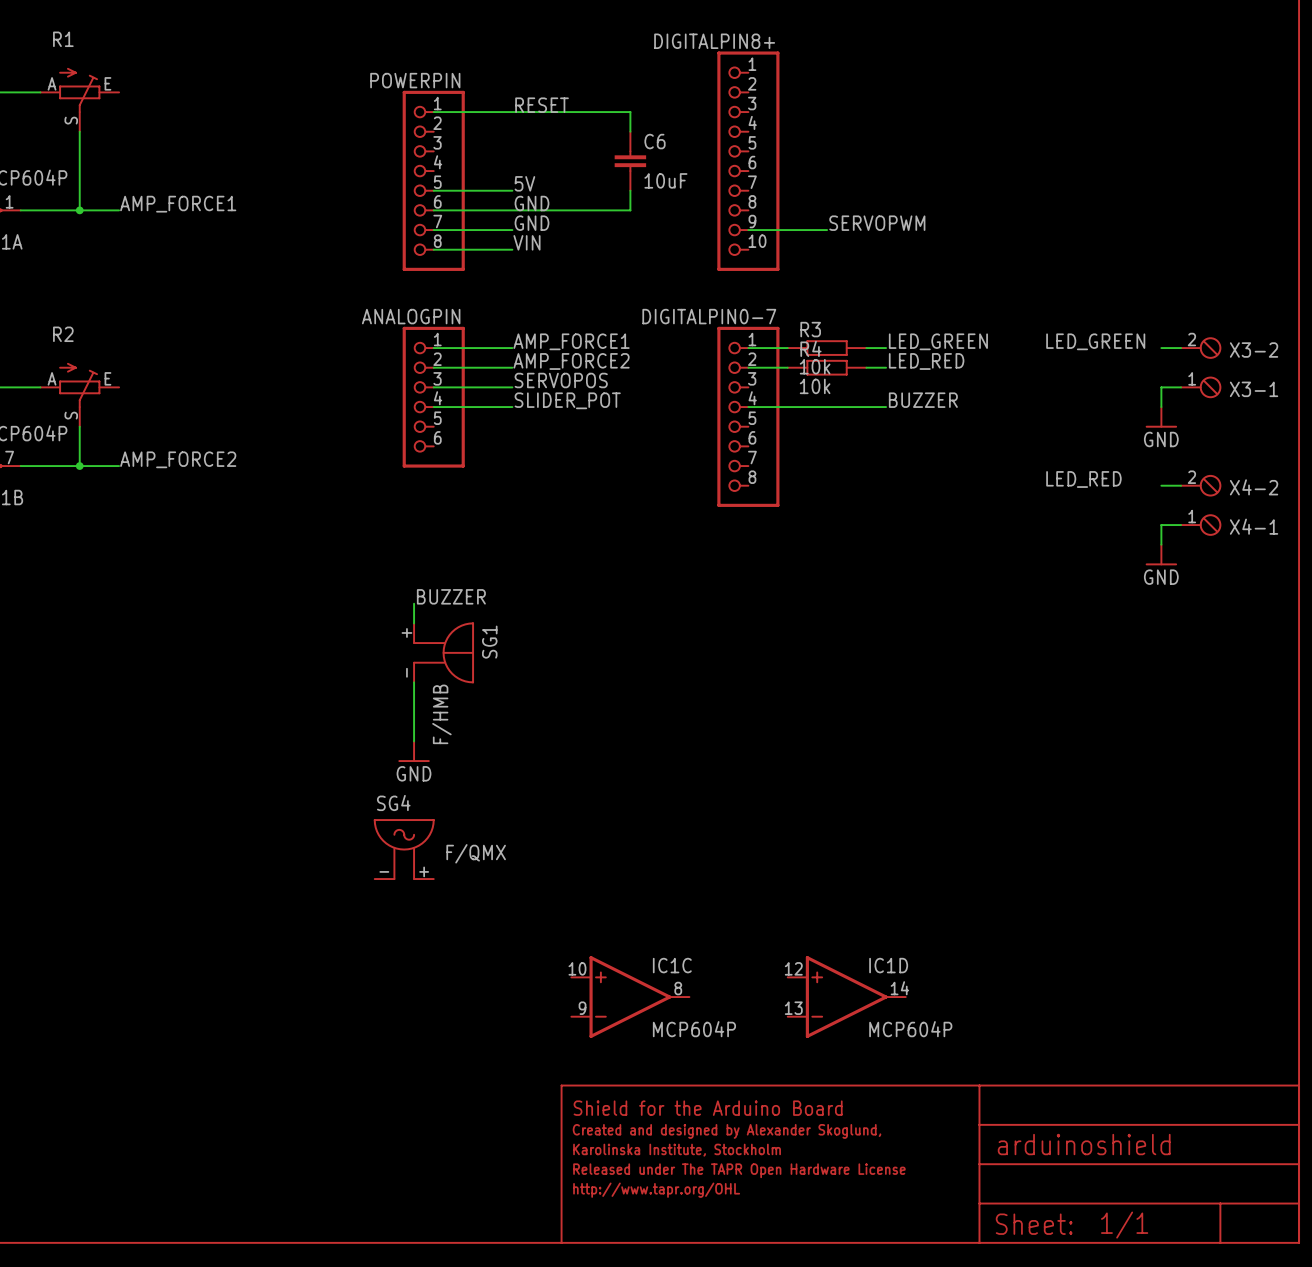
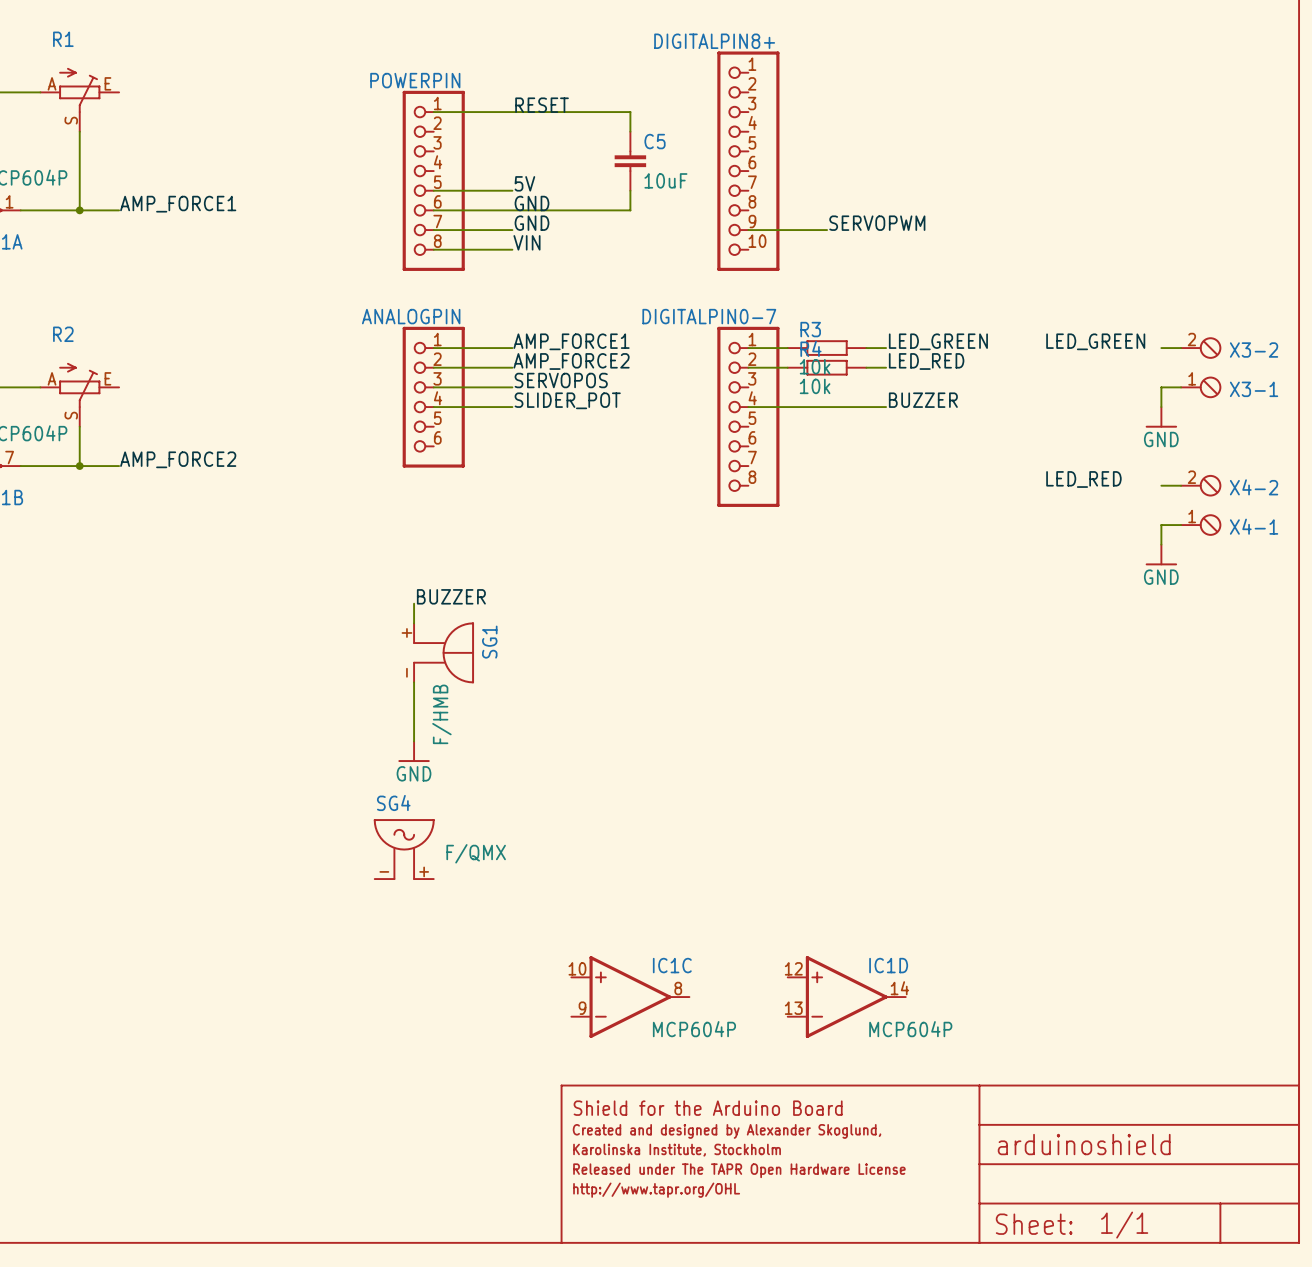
C6 name: C6 (655, 141) -> C5 (655, 141)

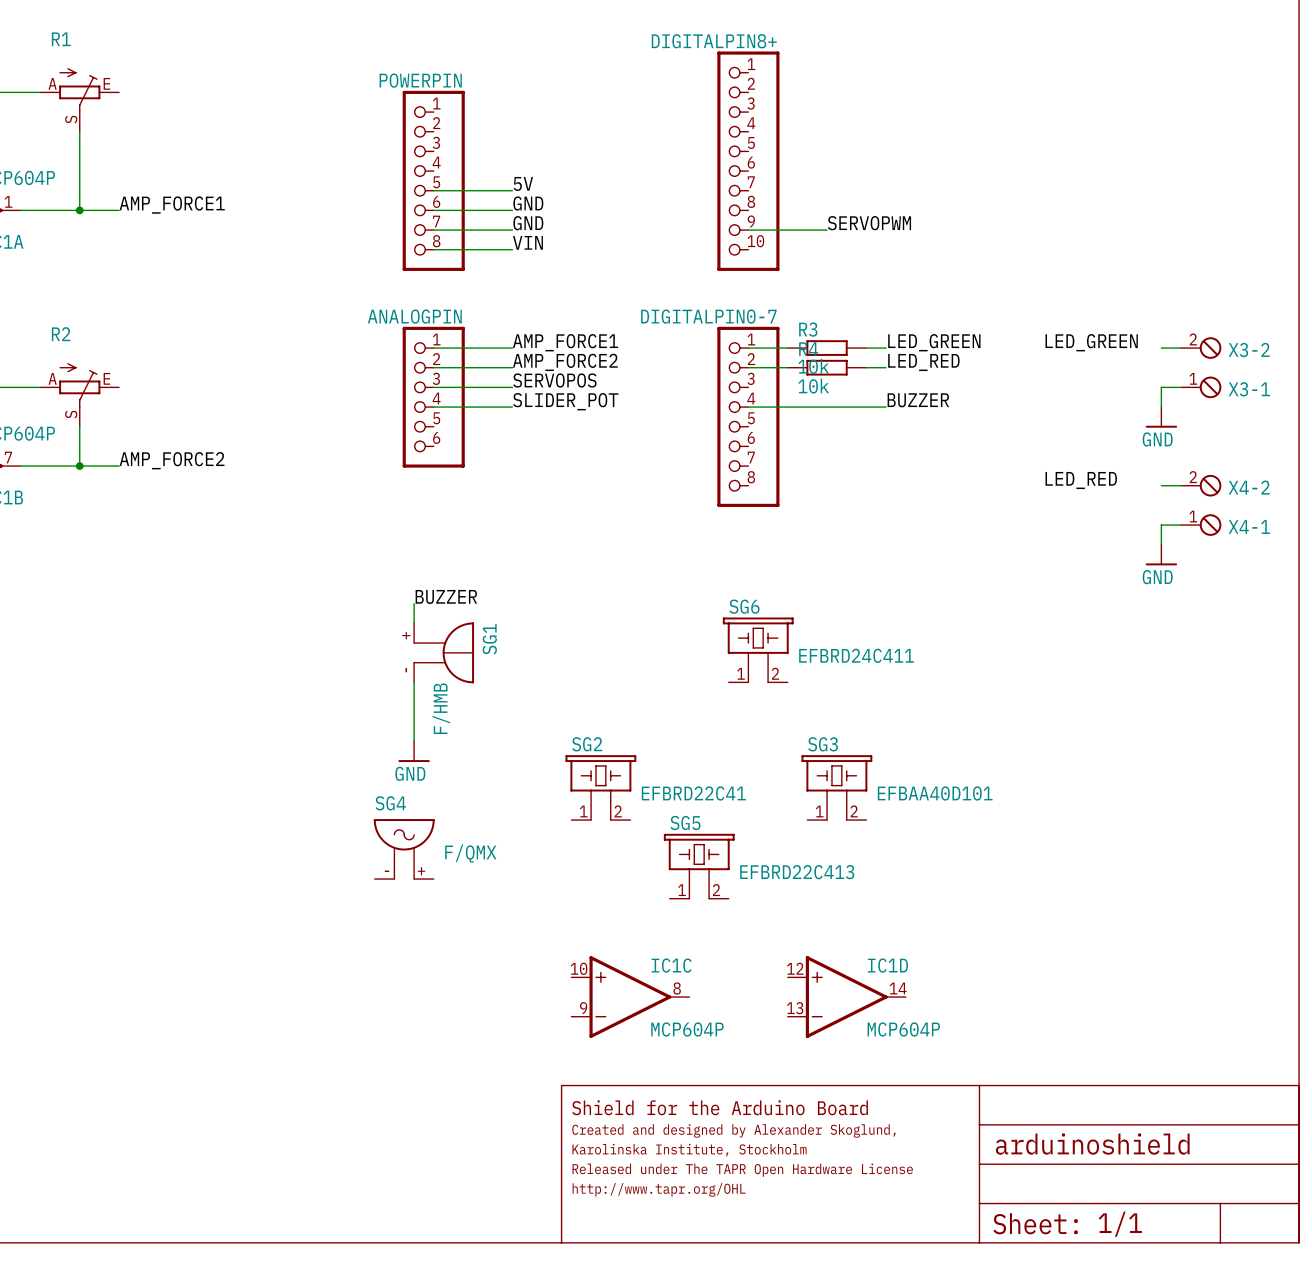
label: RESET (542, 105) -> none
wire: (433, 112) (630, 112) (630, 131) -> none
C5: 10uF (630, 161) -> none
wire: (630, 190) (630, 210) (512, 210) -> none
SG6: none -> EFBRD24C411 (758, 650)
SG2: none -> EFBRD22C41 (600, 787)
SG3: none -> EFBAA40D101 (836, 787)
SG5: none -> EFBRD22C413 (699, 866)

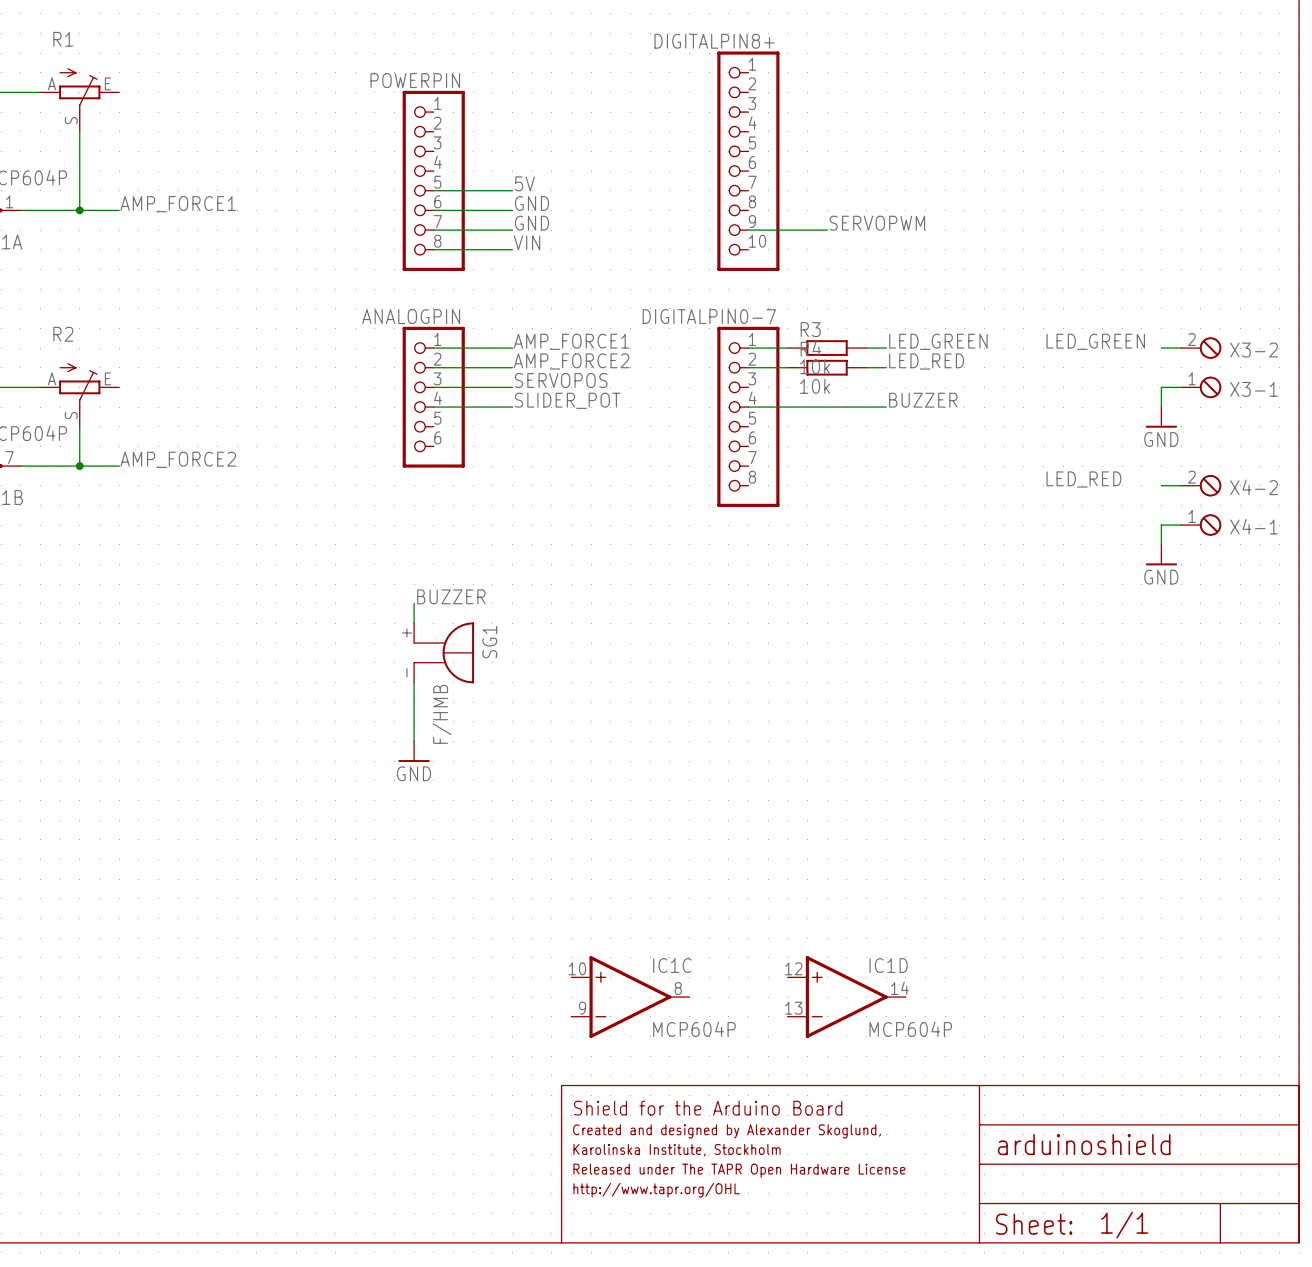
SG6: EFBRD24C411 (758, 650) -> none
SG2: EFBRD22C41 (600, 787) -> none
SG3: EFBAA40D101 (836, 787) -> none
SG4: F/QMX (404, 849) -> none
SG5: EFBRD22C413 (699, 866) -> none

